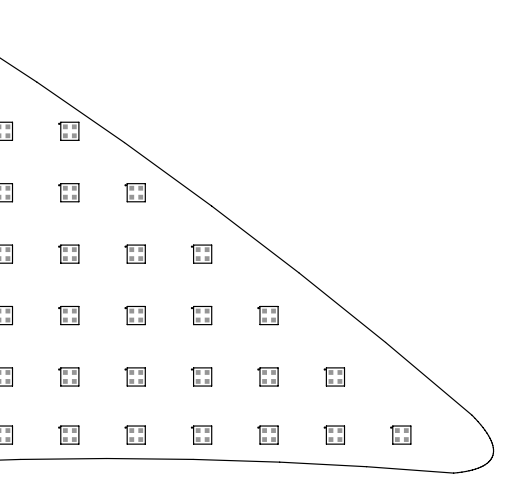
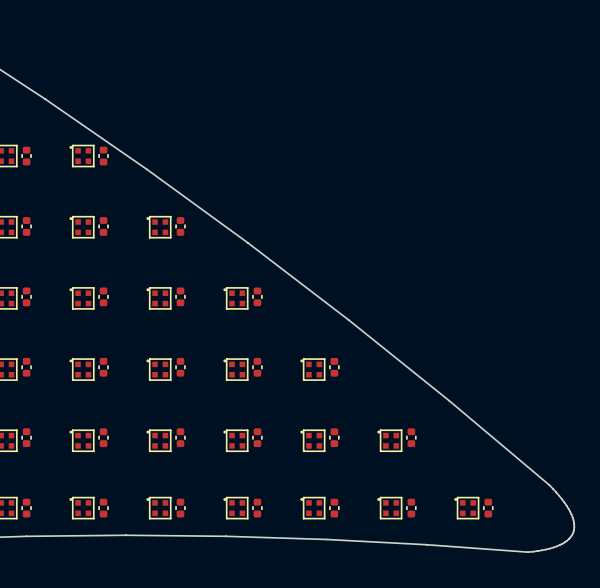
part: none -> (26, 156)
part: none -> (103, 156)
part: none -> (26, 226)
part: none -> (103, 226)
part: none -> (180, 226)
part: none -> (26, 296)
part: none -> (103, 296)
part: none -> (180, 296)
part: none -> (257, 296)
part: none -> (26, 367)
part: none -> (103, 367)
part: none -> (180, 367)
part: none -> (257, 367)
part: none -> (334, 367)
part: none -> (26, 437)
part: none -> (103, 437)
part: none -> (180, 437)
part: none -> (257, 437)
part: none -> (334, 437)
part: none -> (411, 437)
part: none -> (26, 508)
part: none -> (103, 508)
part: none -> (180, 508)
part: none -> (257, 508)
part: none -> (334, 508)
part: none -> (411, 508)
part: none -> (488, 508)

